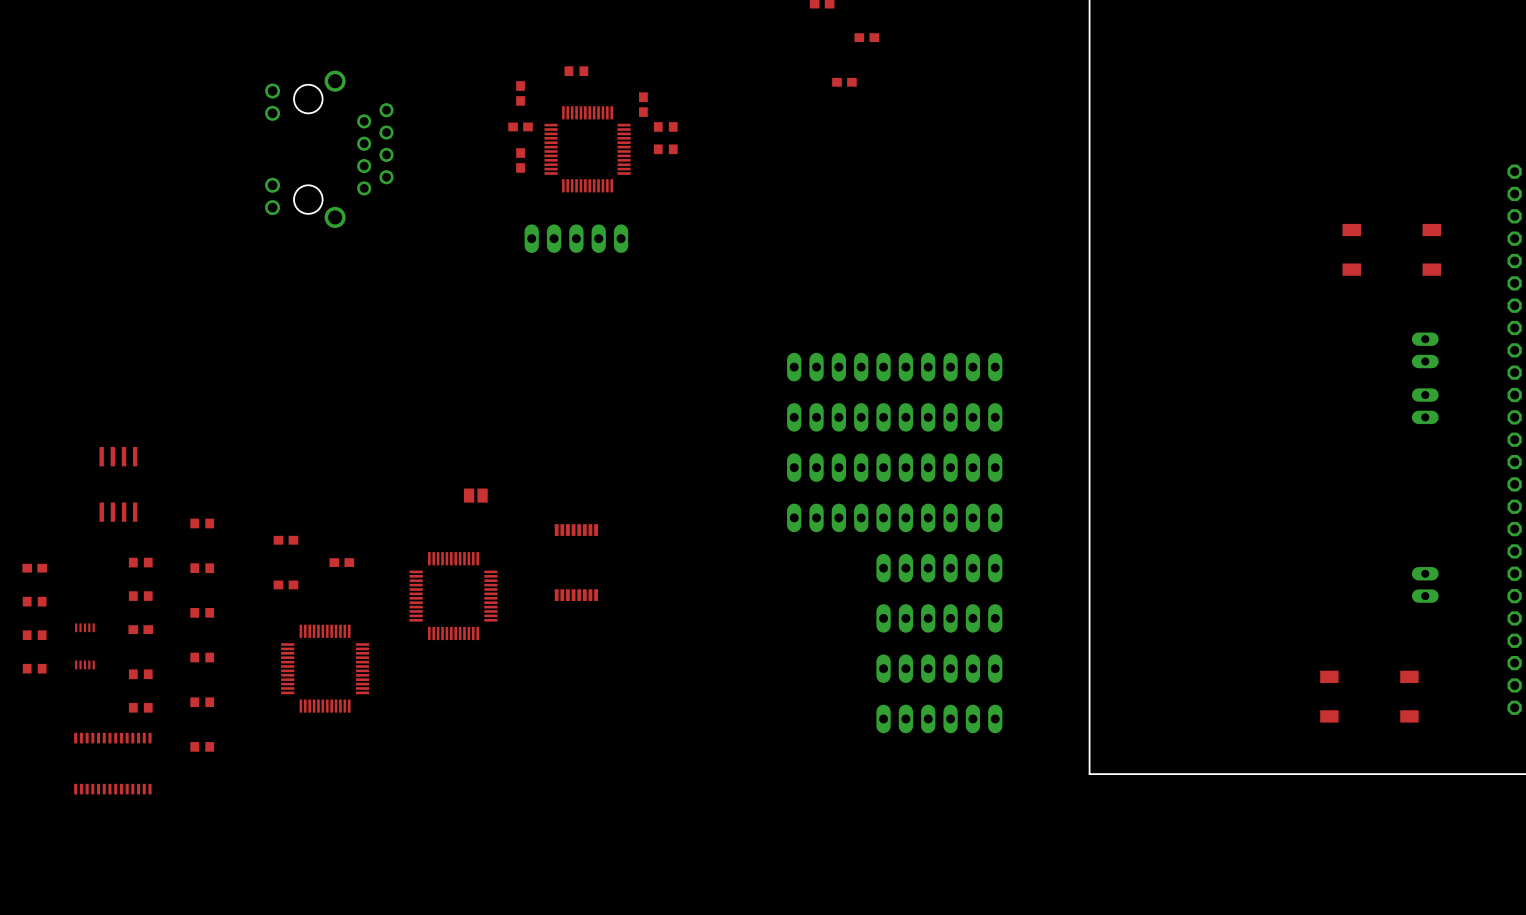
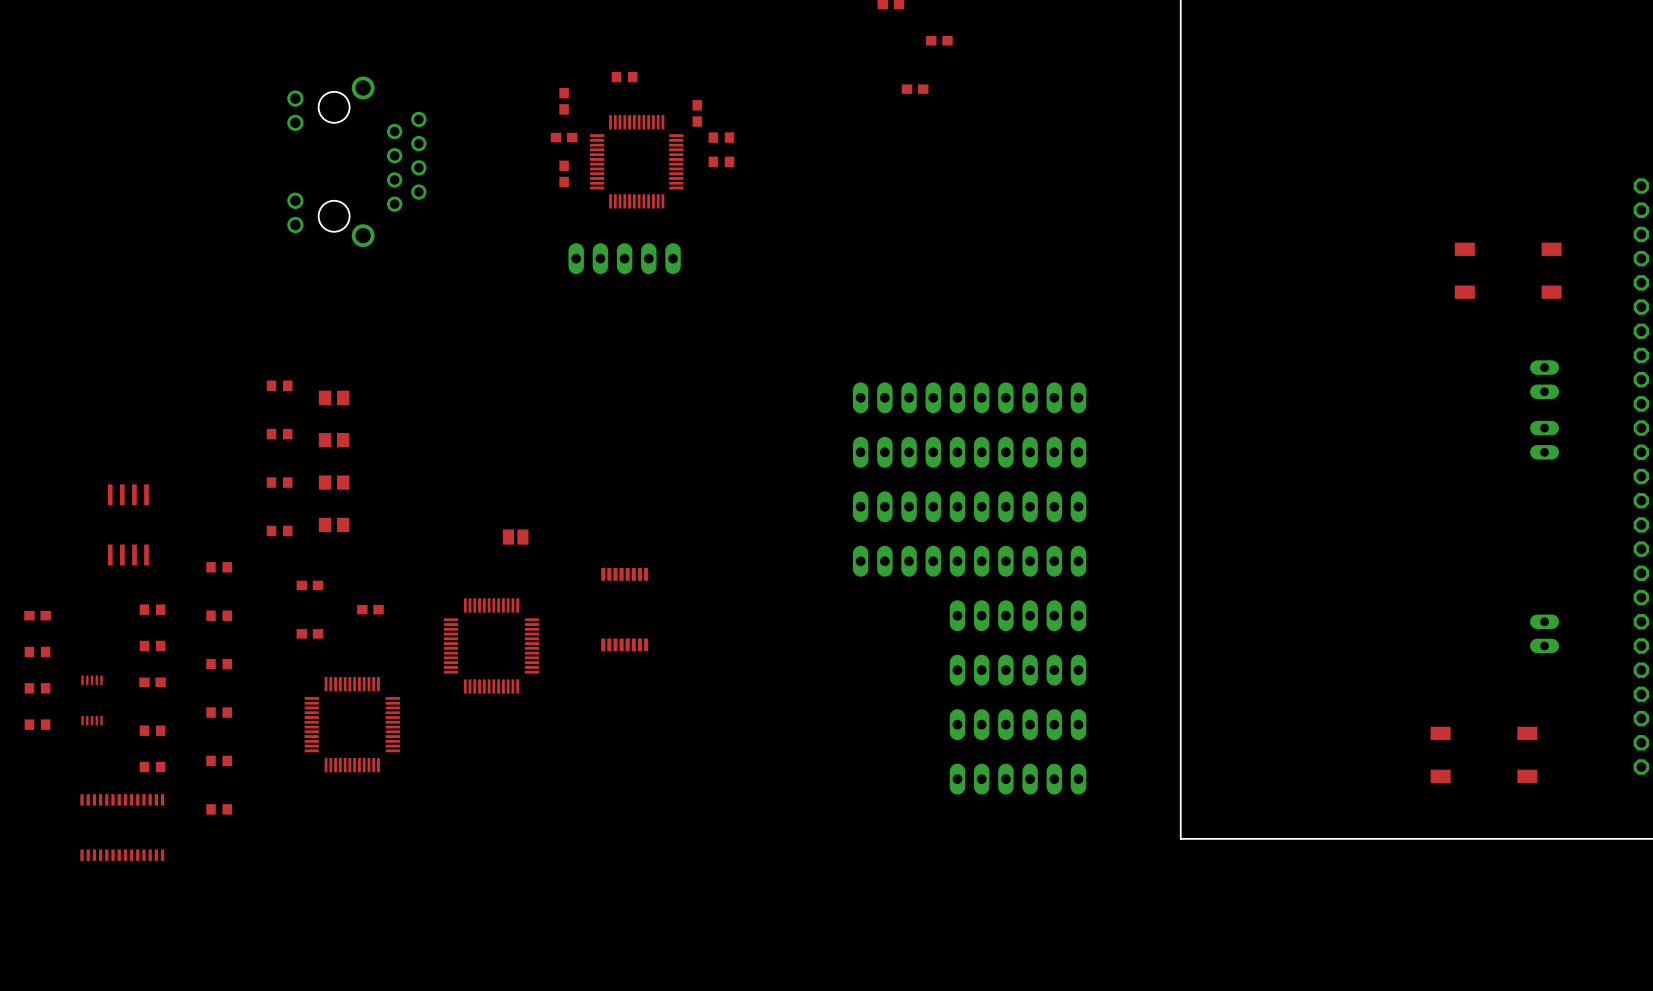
part: none -> (279, 385)
part: none -> (334, 397)
part: none -> (279, 434)
part: none -> (334, 440)
part: none -> (279, 482)
part: none -> (334, 482)
part: none -> (334, 524)
part: none -> (279, 530)

